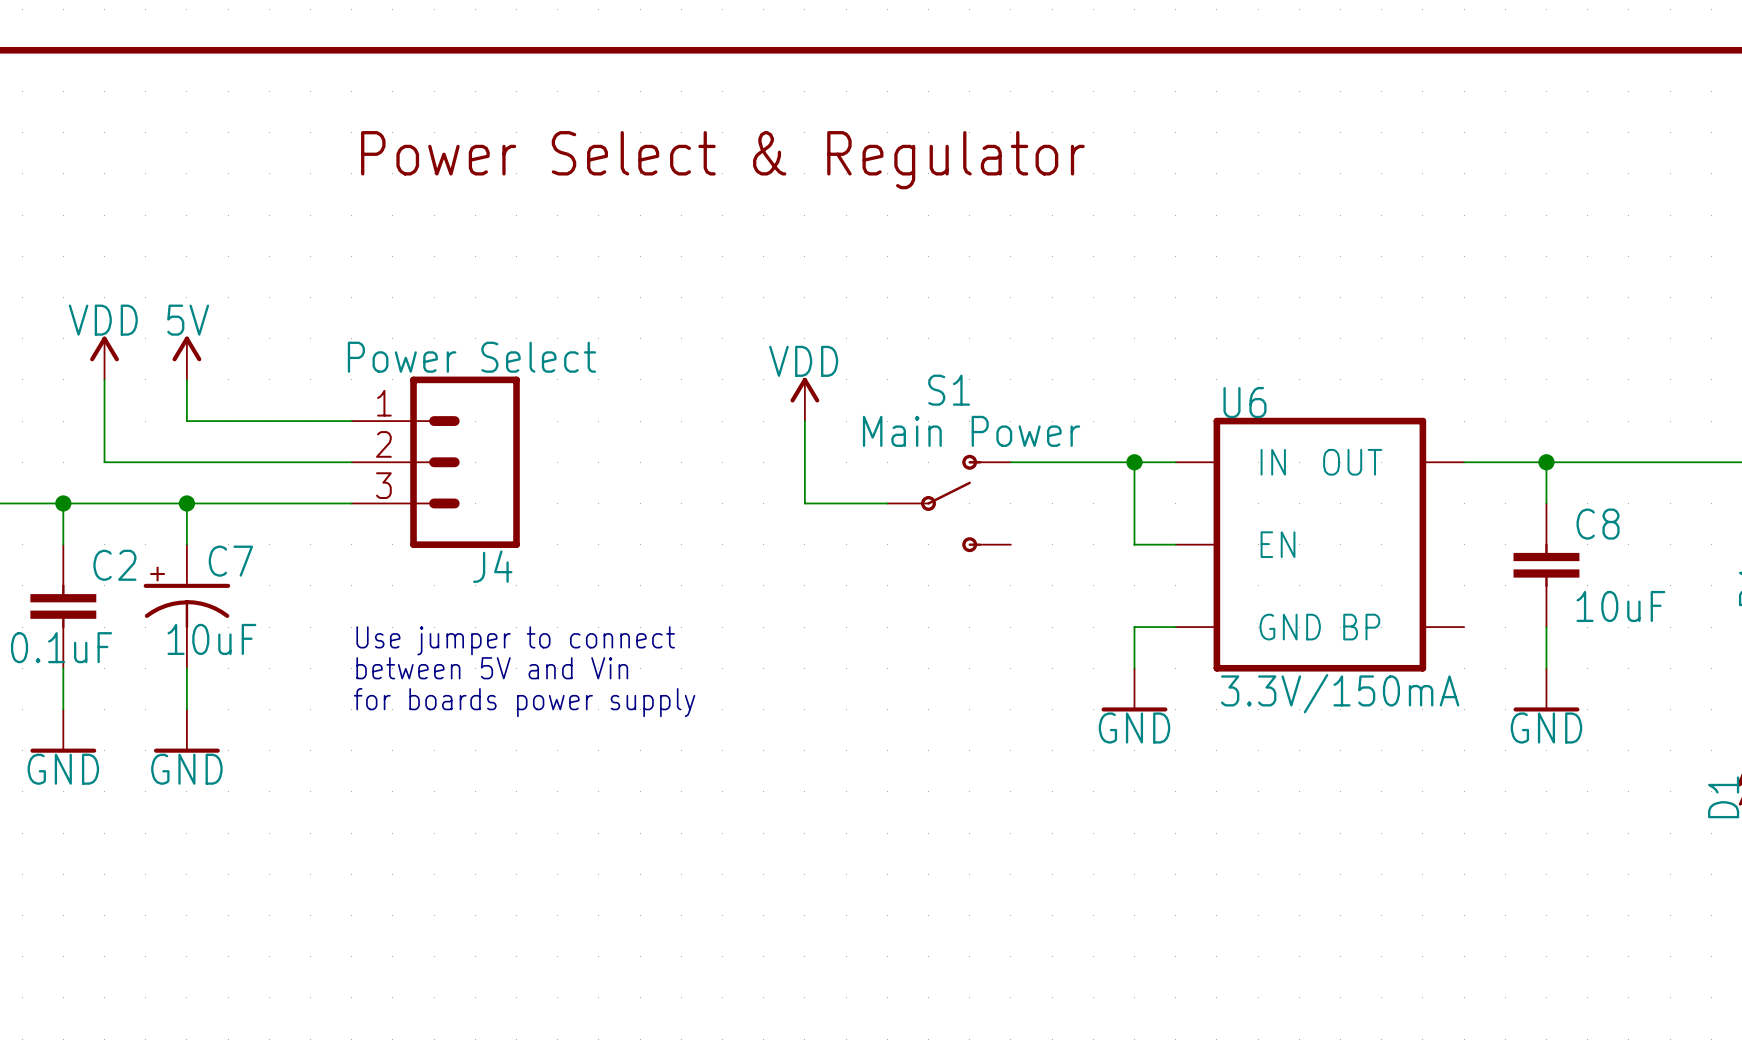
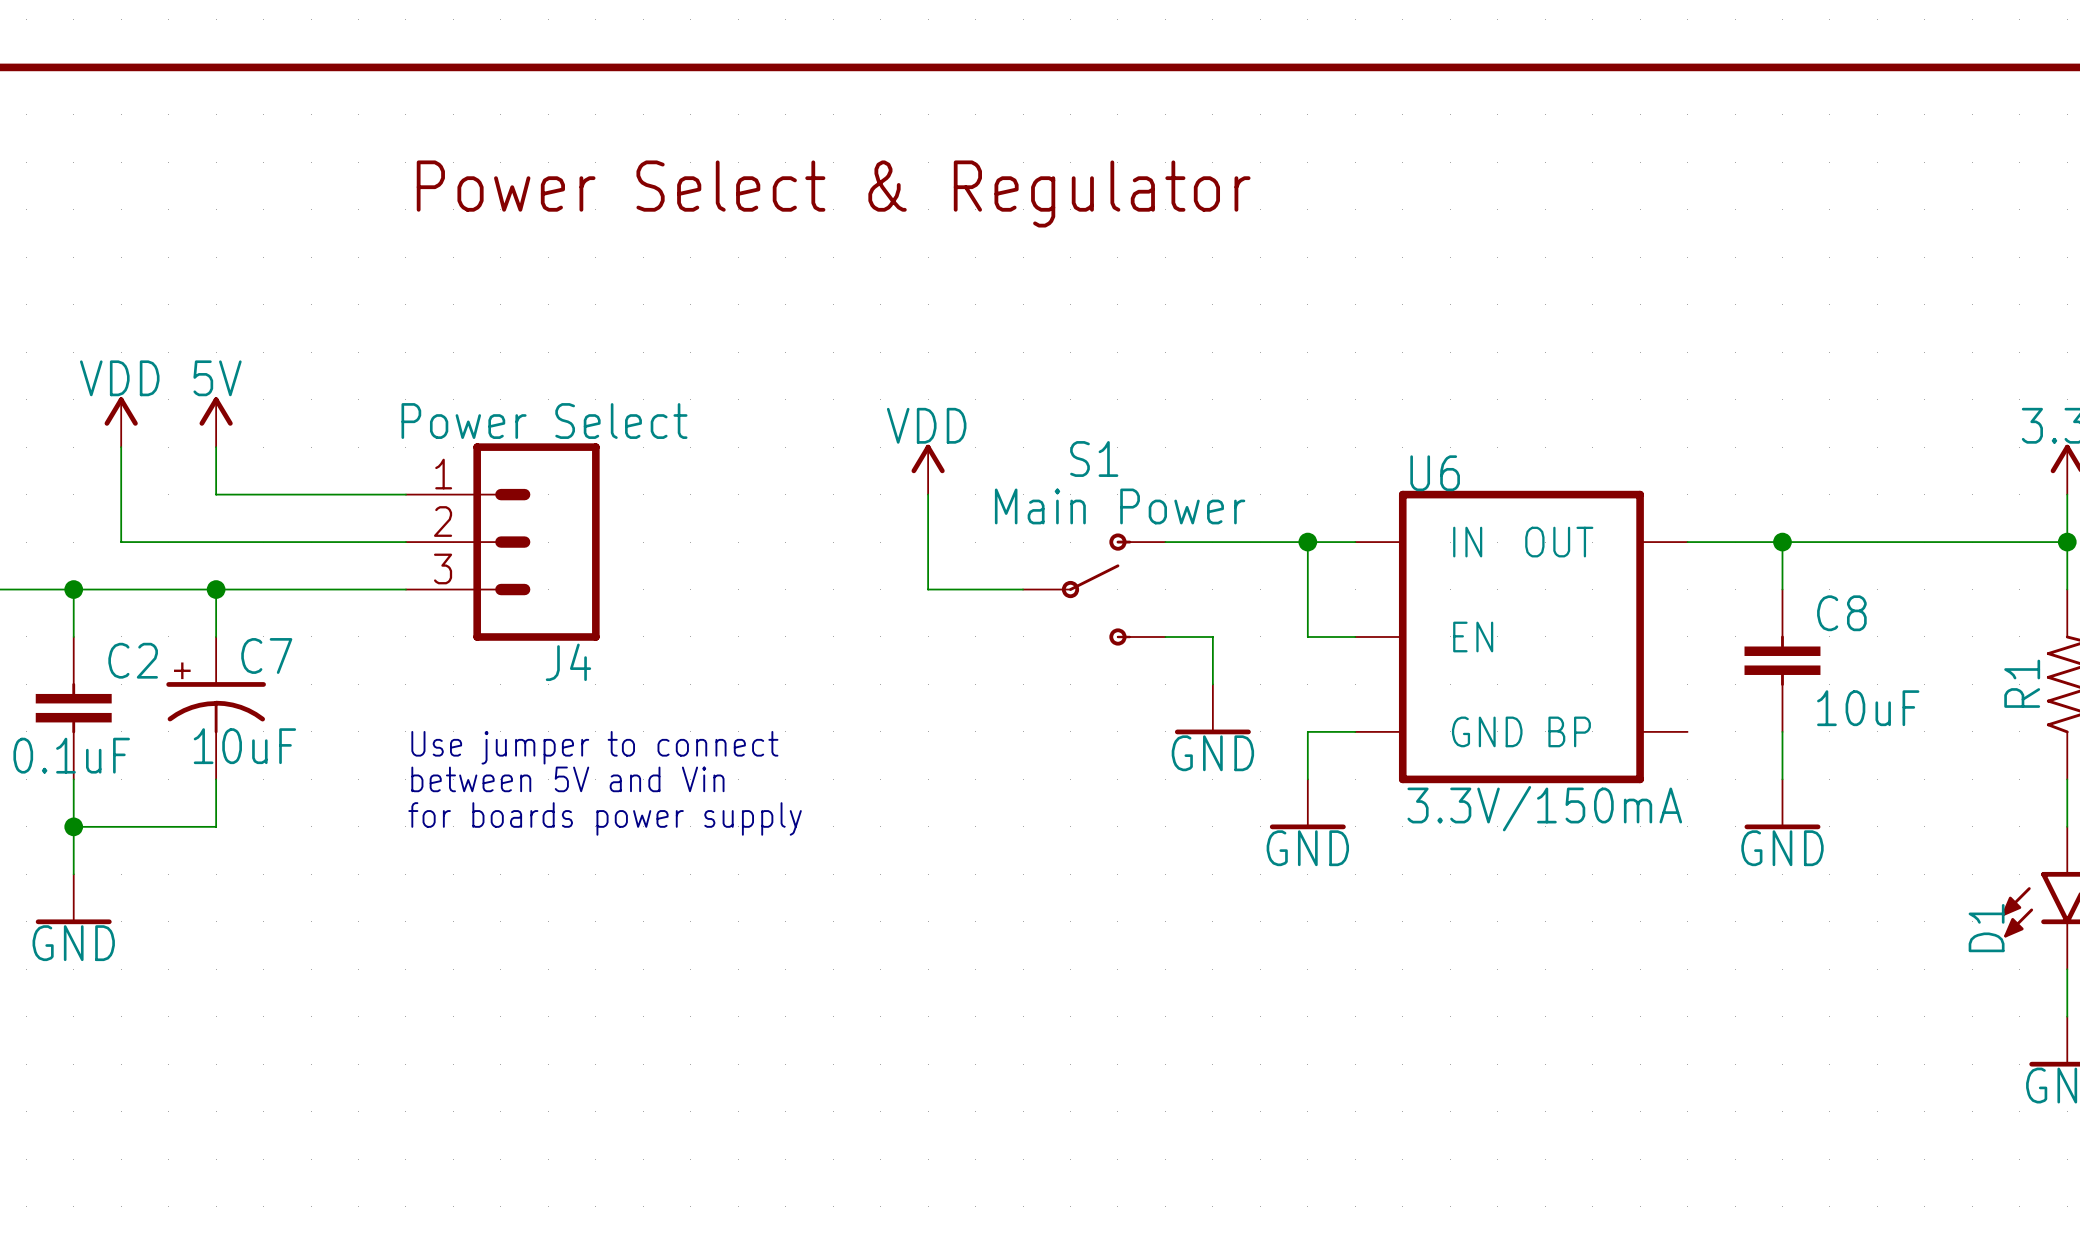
wire: none -> (1165, 636) (1212, 636) (1212, 684)
power symbol: none -> GND (1212, 709)
junction: none -> (73, 826)
wire: none -> (216, 826) (73, 826) (73, 874)
power symbol position: GND (63, 731) -> GND (73, 899)
power symbol: GND (186, 731) -> none

